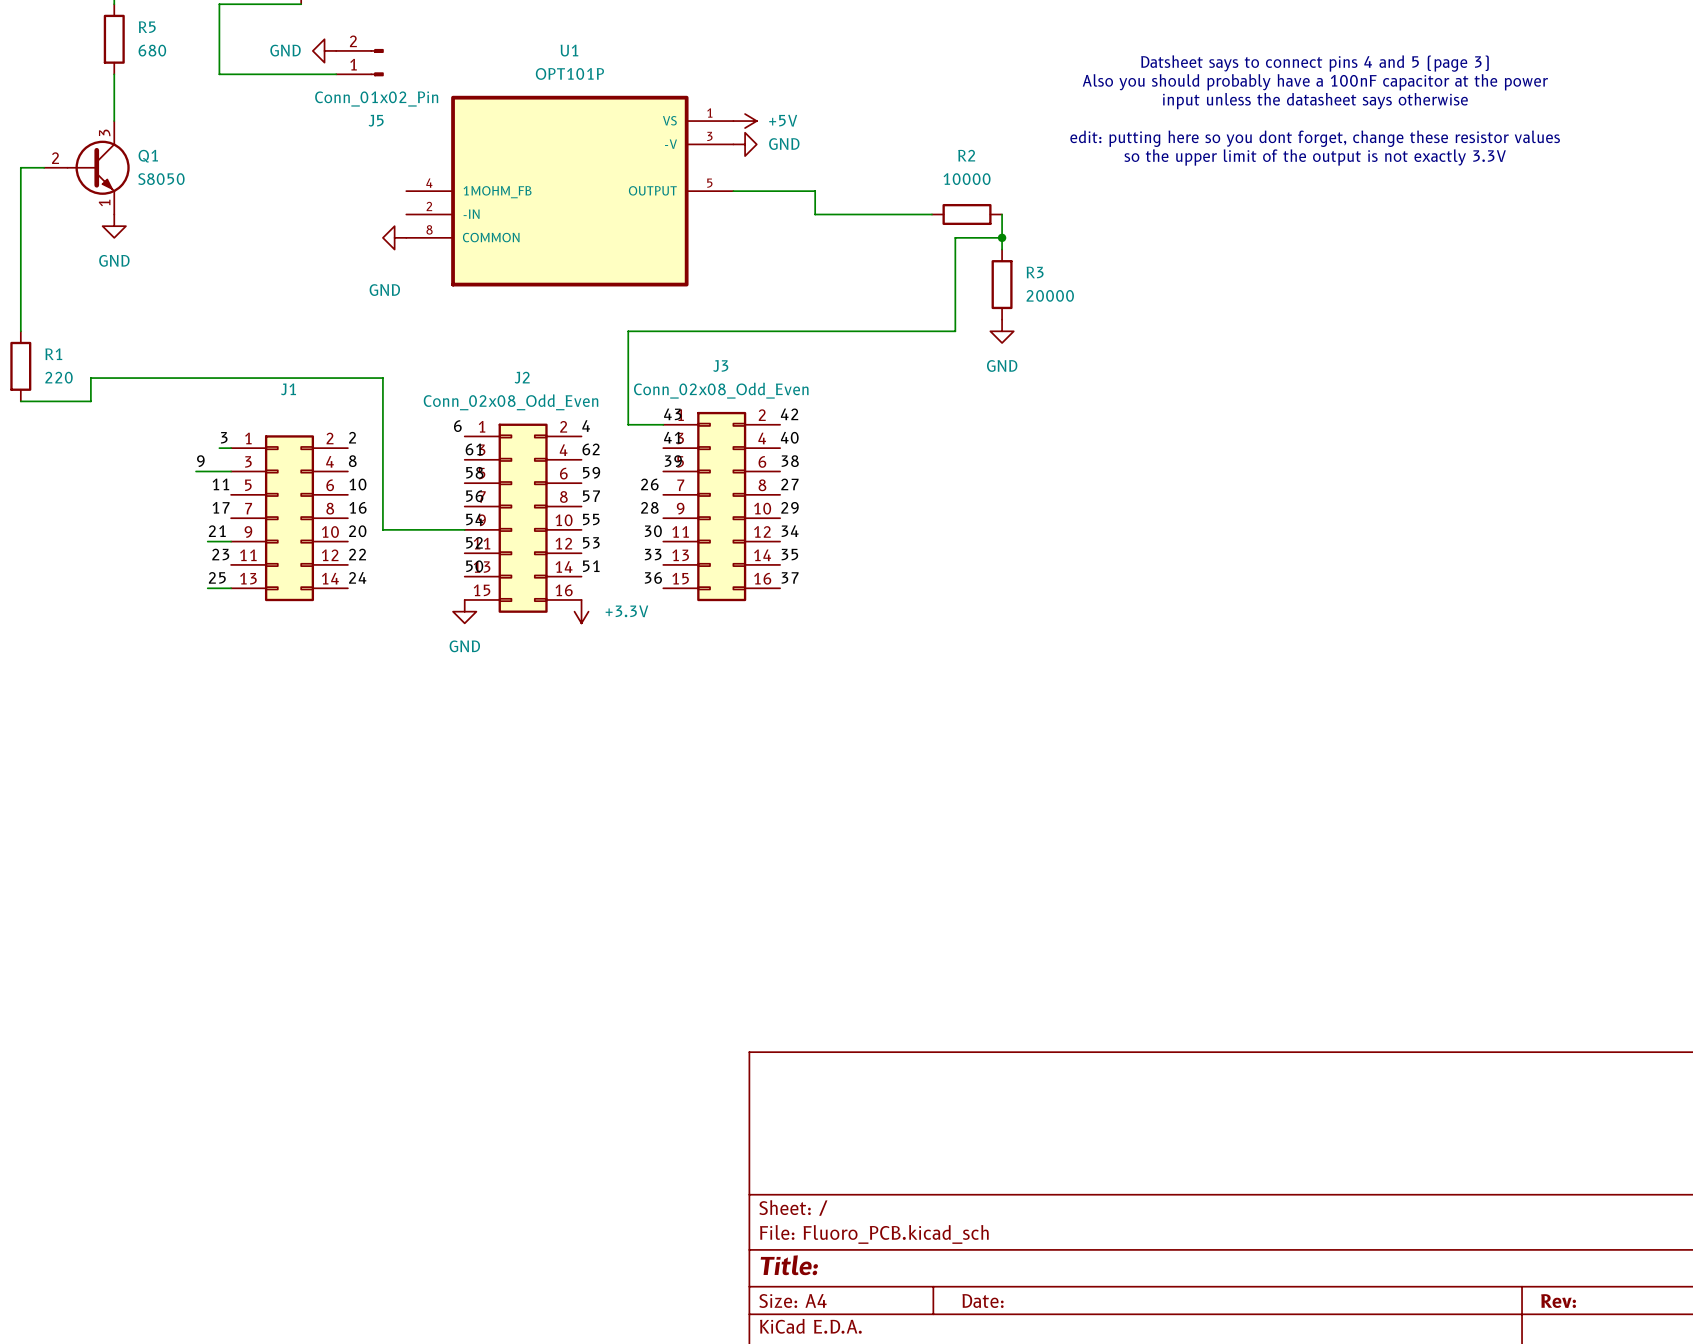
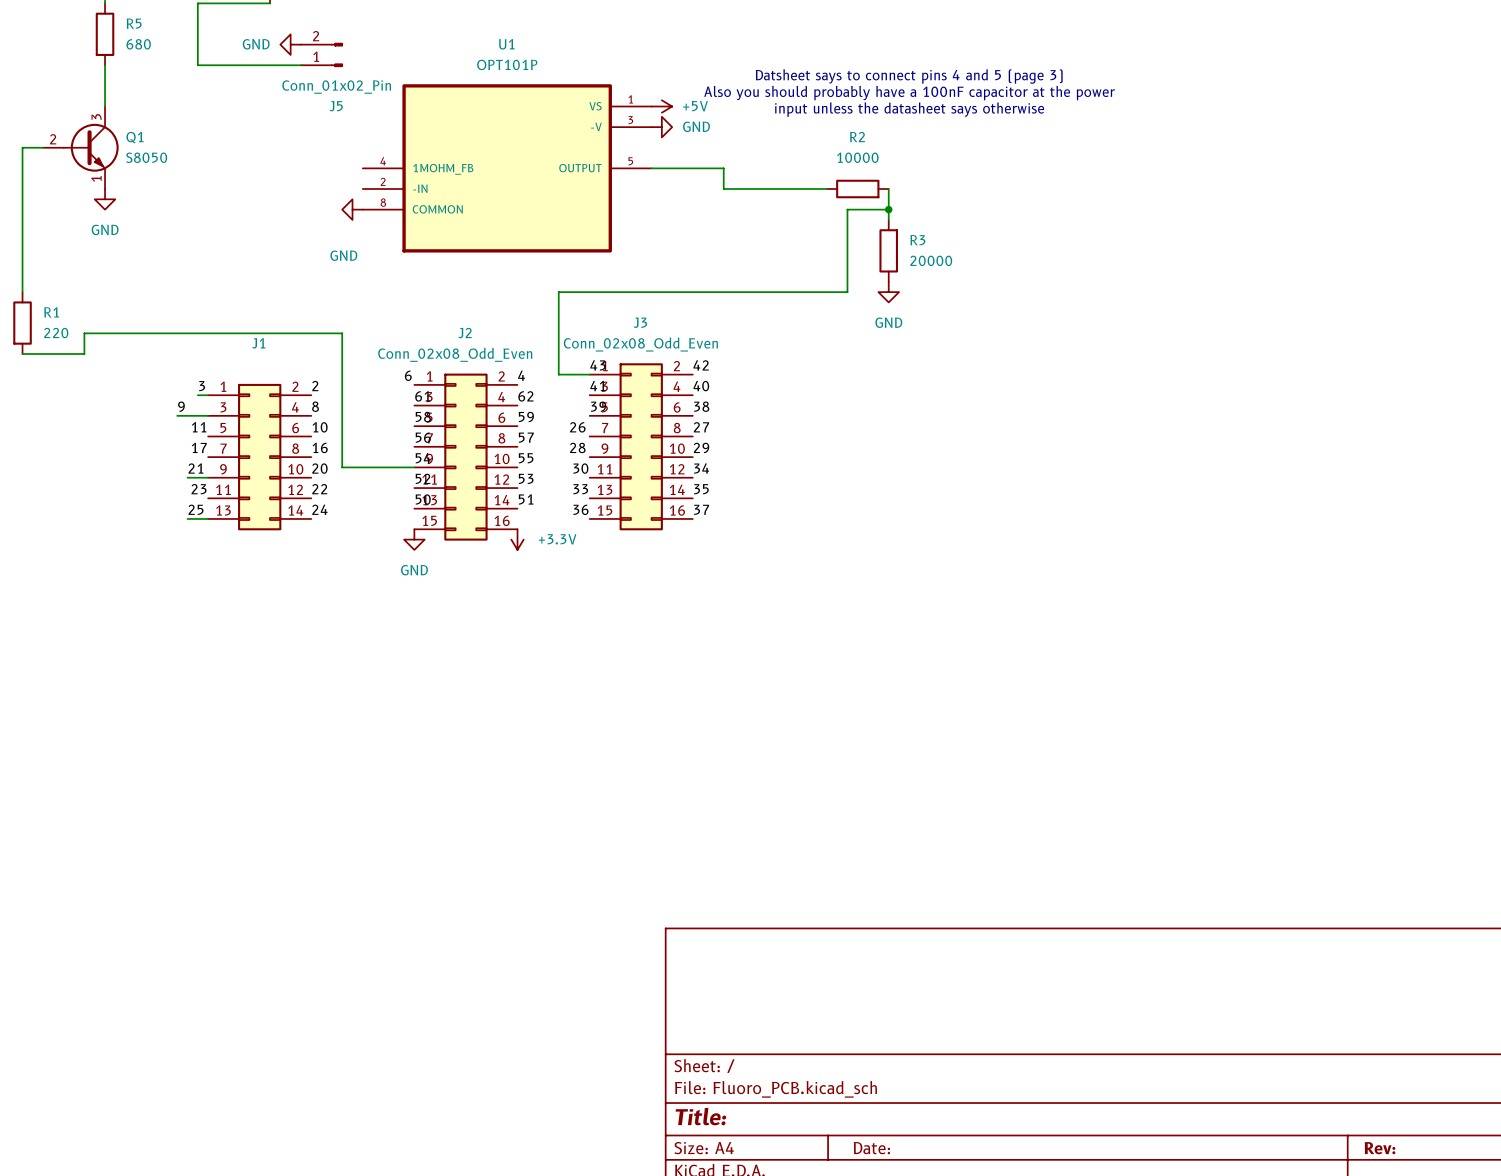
text: Datsheet says to connect pins 4 and 5 (page 3) (1315, 63) -> none
text: Also you should probably have a 100nF capacitor at the power (1315, 82) -> none
text: none -> Datsheet says to connect pins 4 and 5 (page 3) (909, 76)
text: input unless the datasheet says otherwise (1315, 101) -> none
text: none -> Also you should probably have a 100nF capacitor at the power (909, 93)
text: none -> input unless the datasheet says otherwise (909, 109)
text: edit: putting here so you dont forget, change these resistor values (1315, 138) -> none
text: so the upper limit of the output is not exactly 3.3V (1315, 157) -> none

